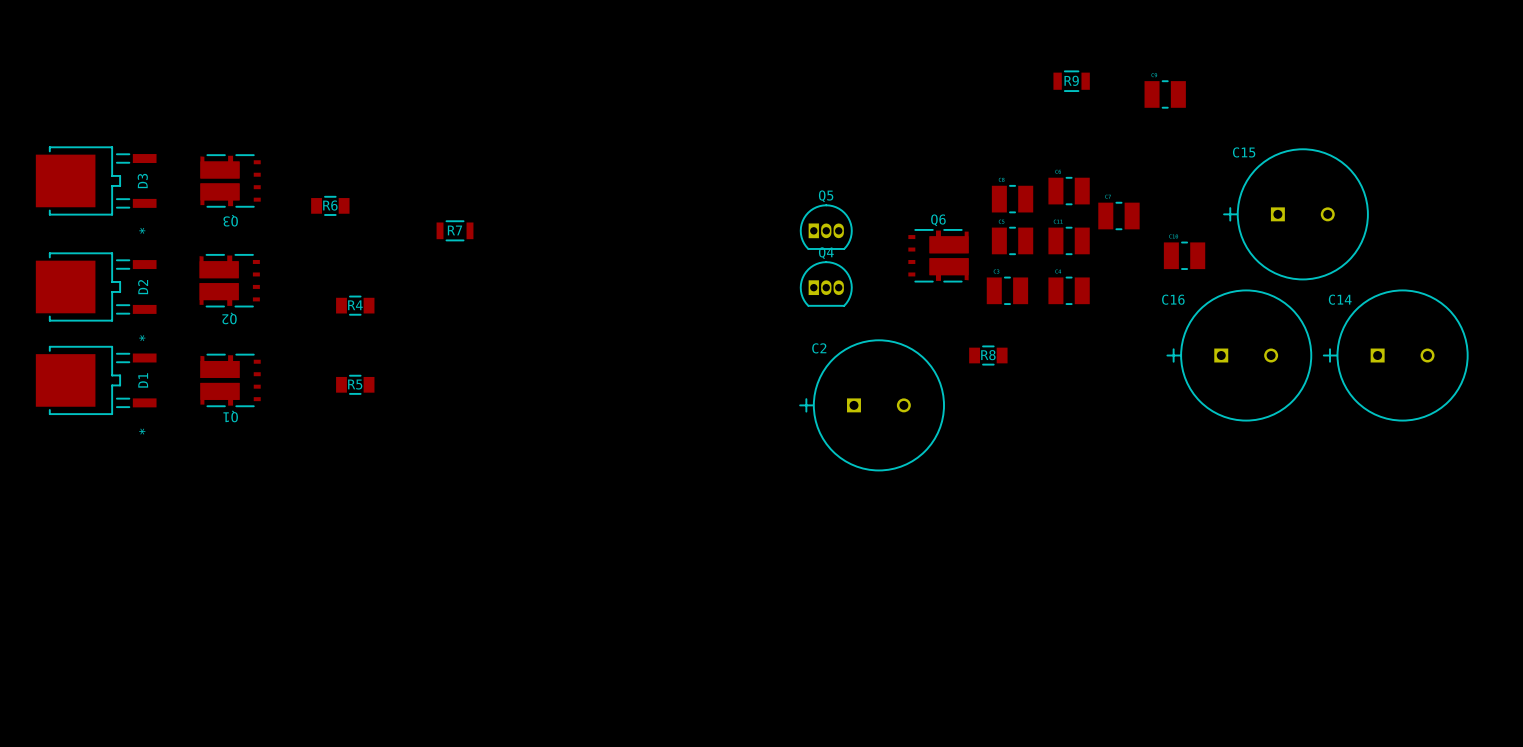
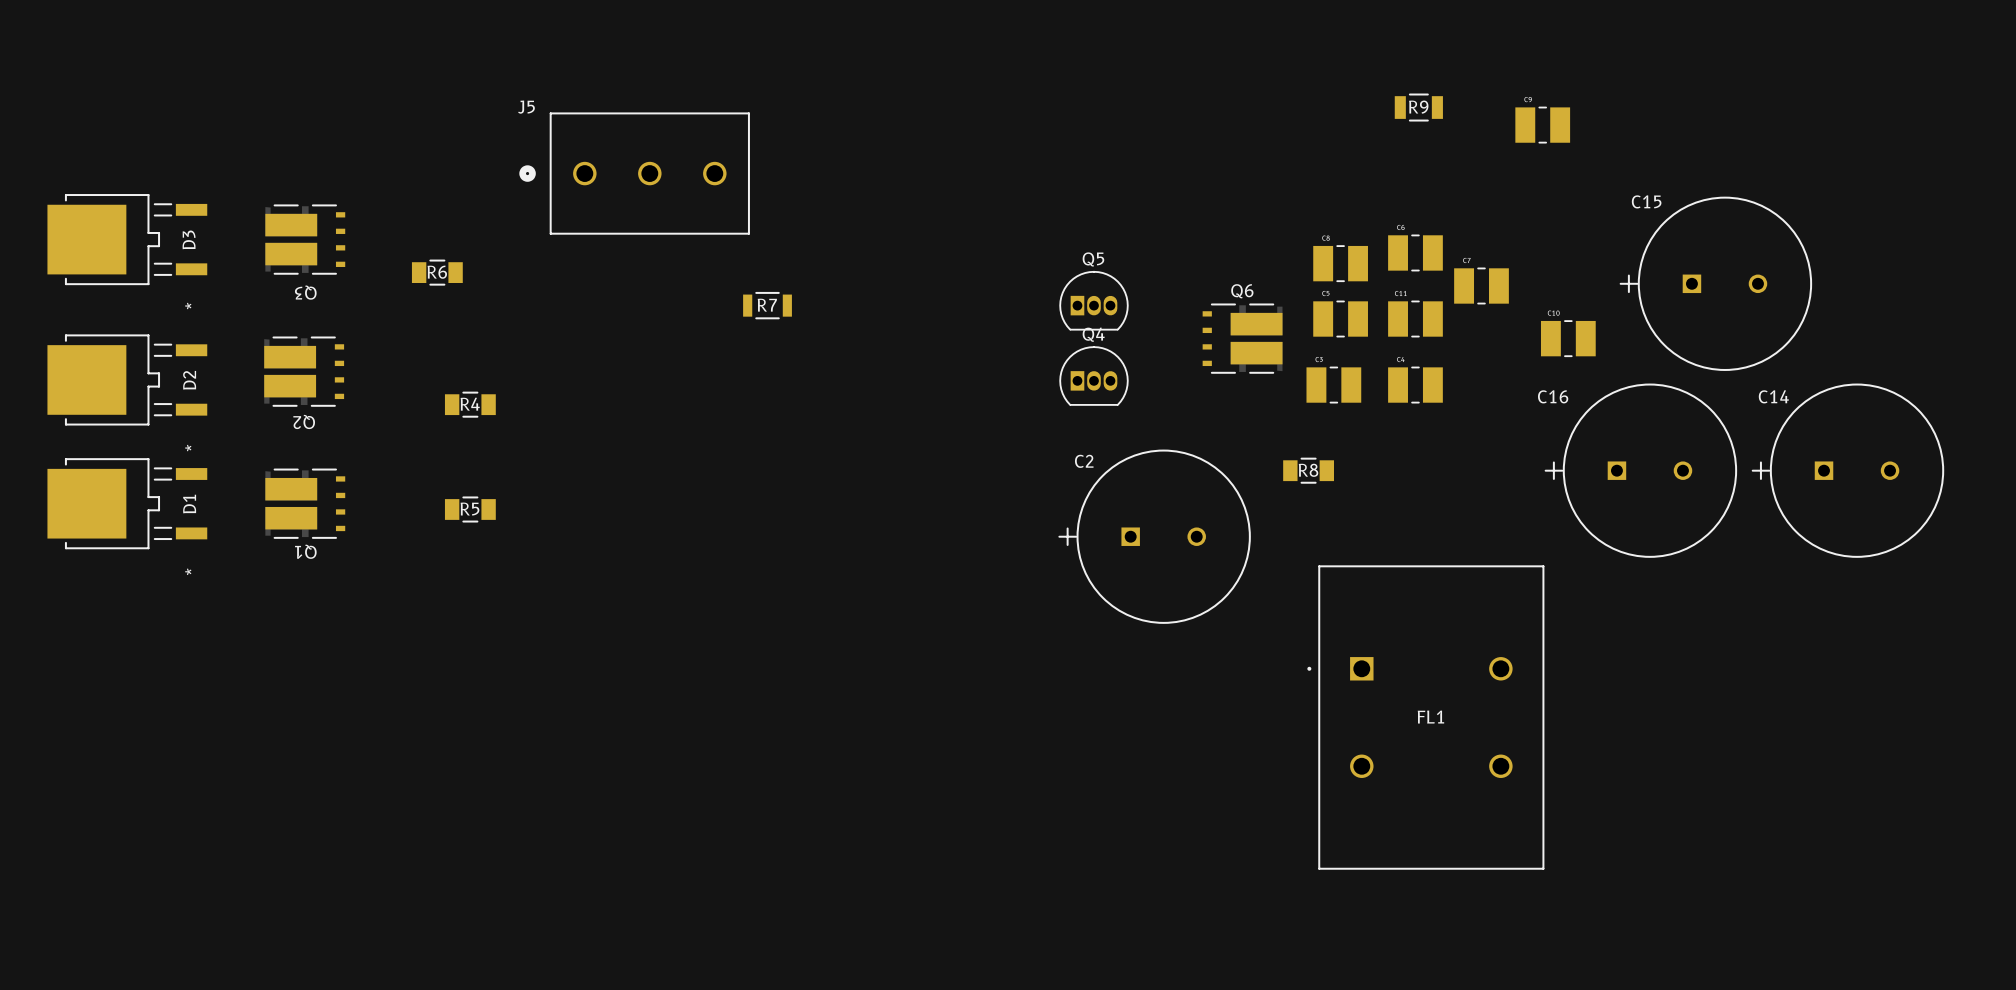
J5: none -> (634, 173)
R7 position: (455, 230) -> (767, 305)
FL1: none -> (1425, 717)

